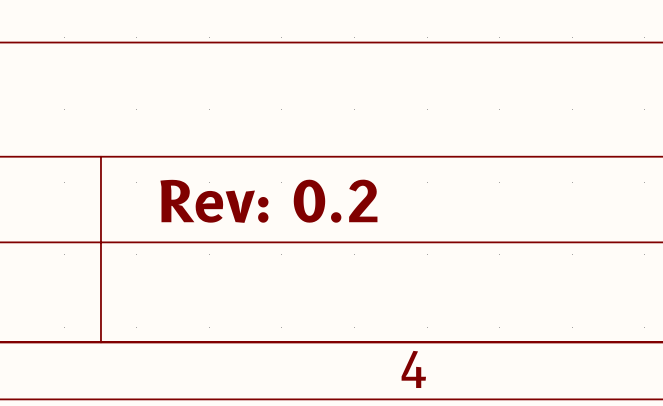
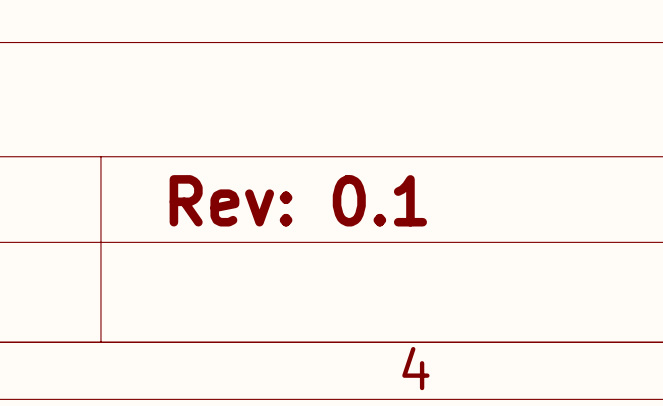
title block: Rev: 0.2 (268, 201) -> Rev: 0.1 (298, 200)

